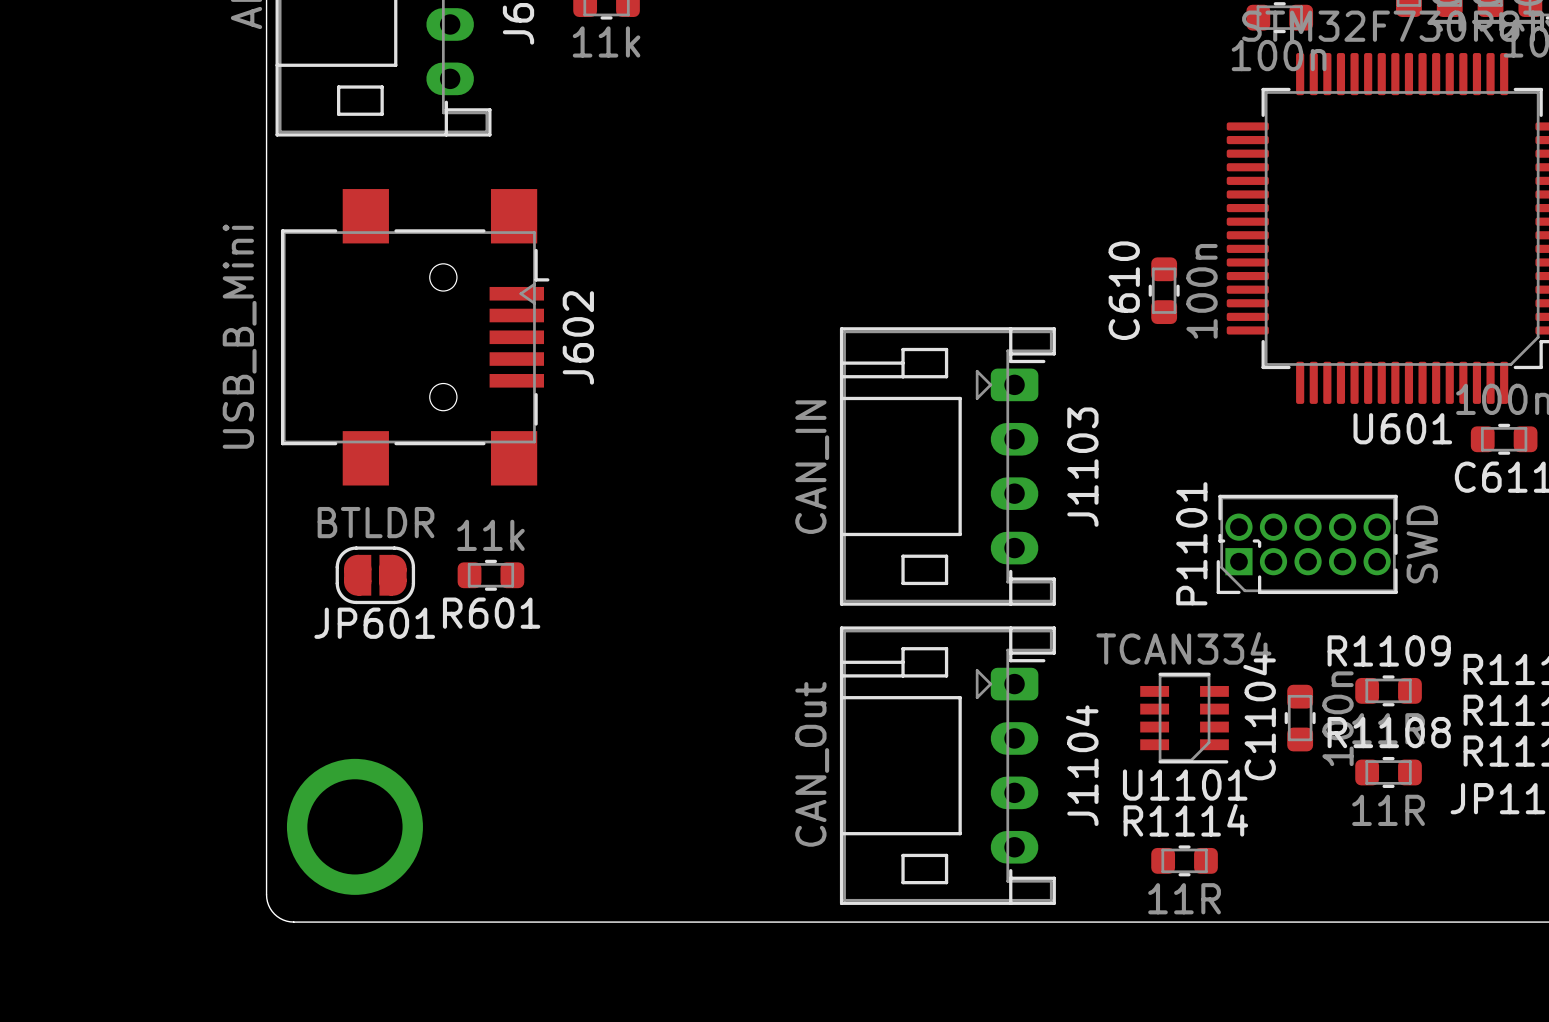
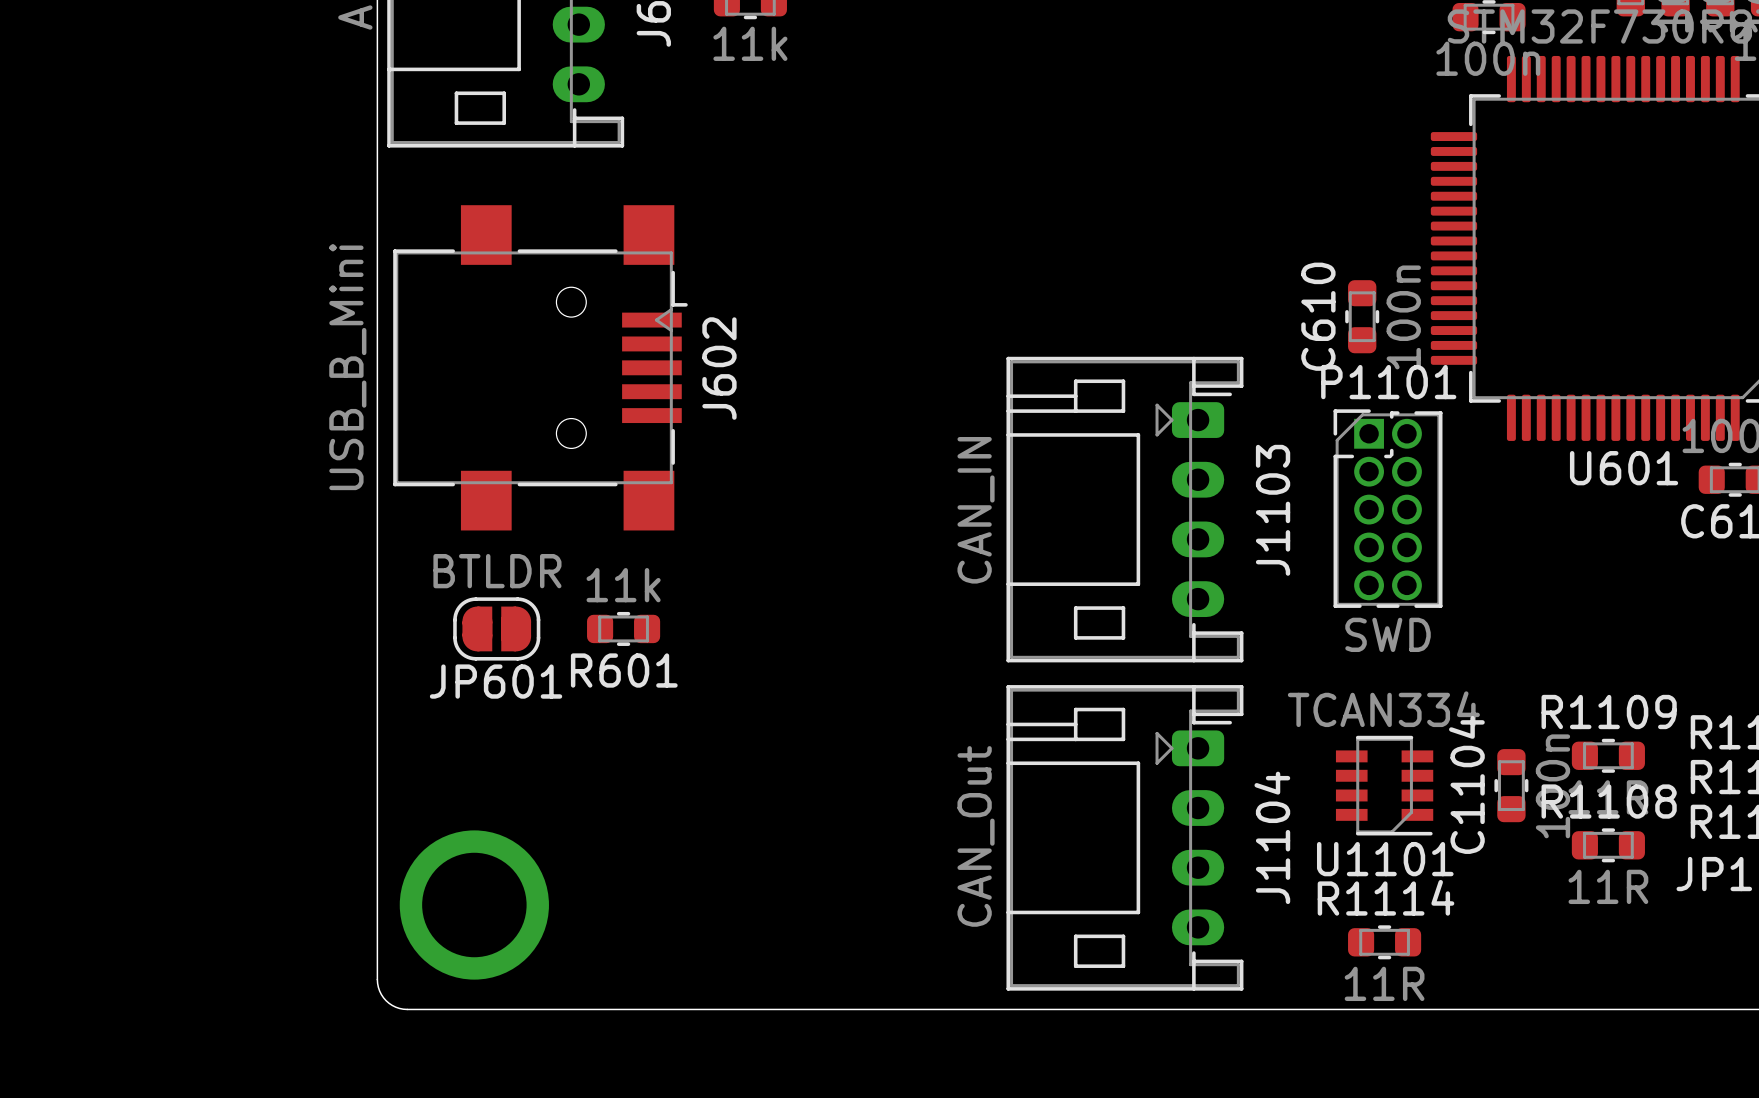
P1101 rotation: 0° (1307, 544) -> 90° clockwise (1388, 508)
P1101 position: (1307, 544) -> (1388, 508)

